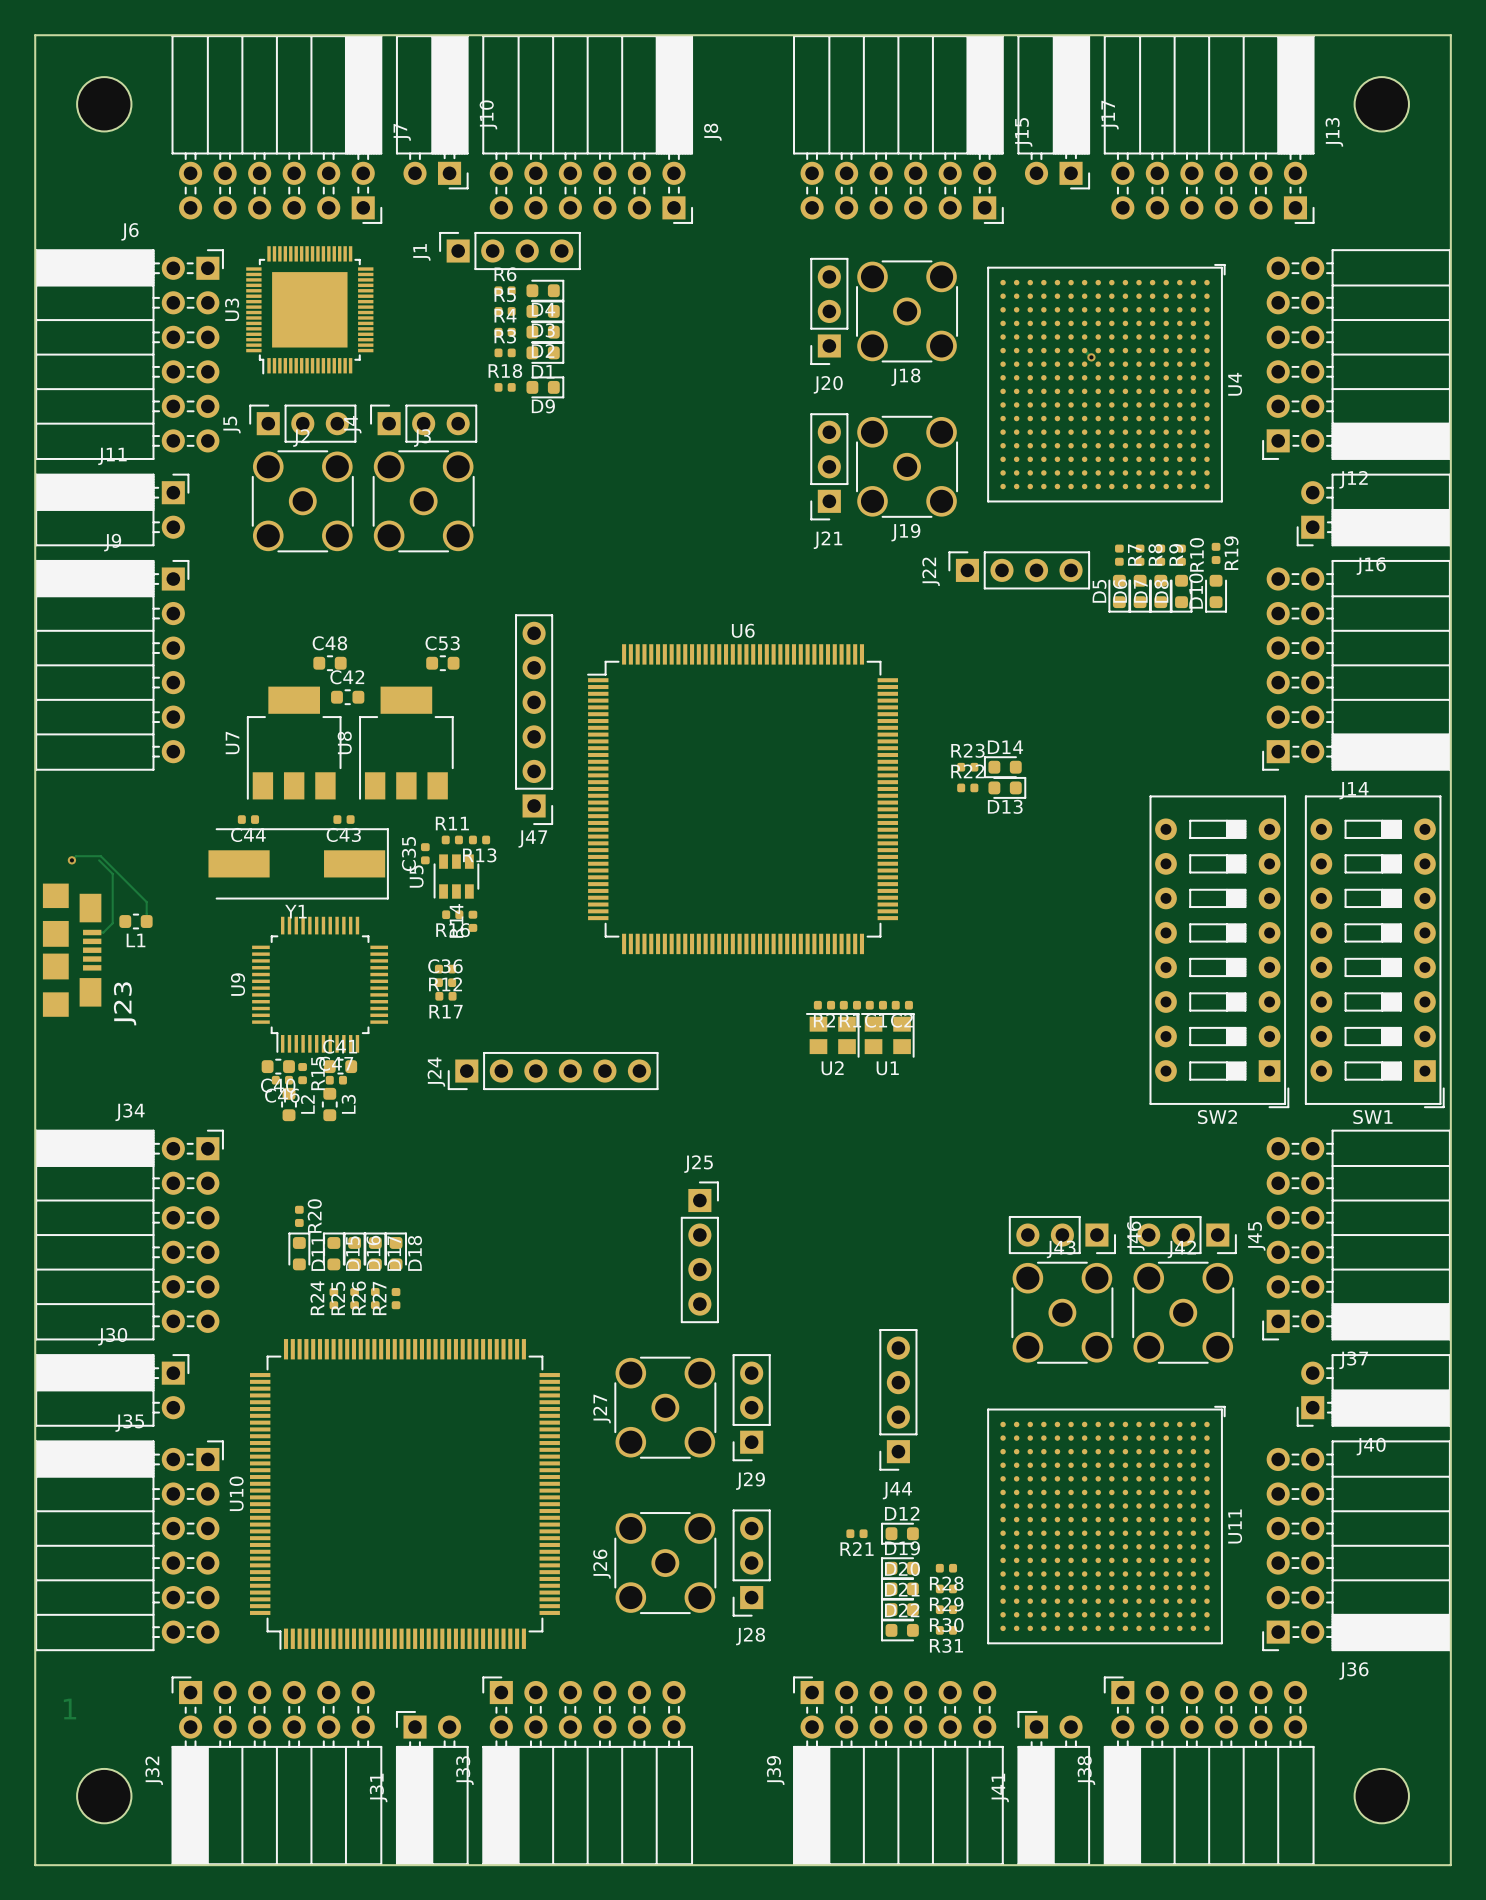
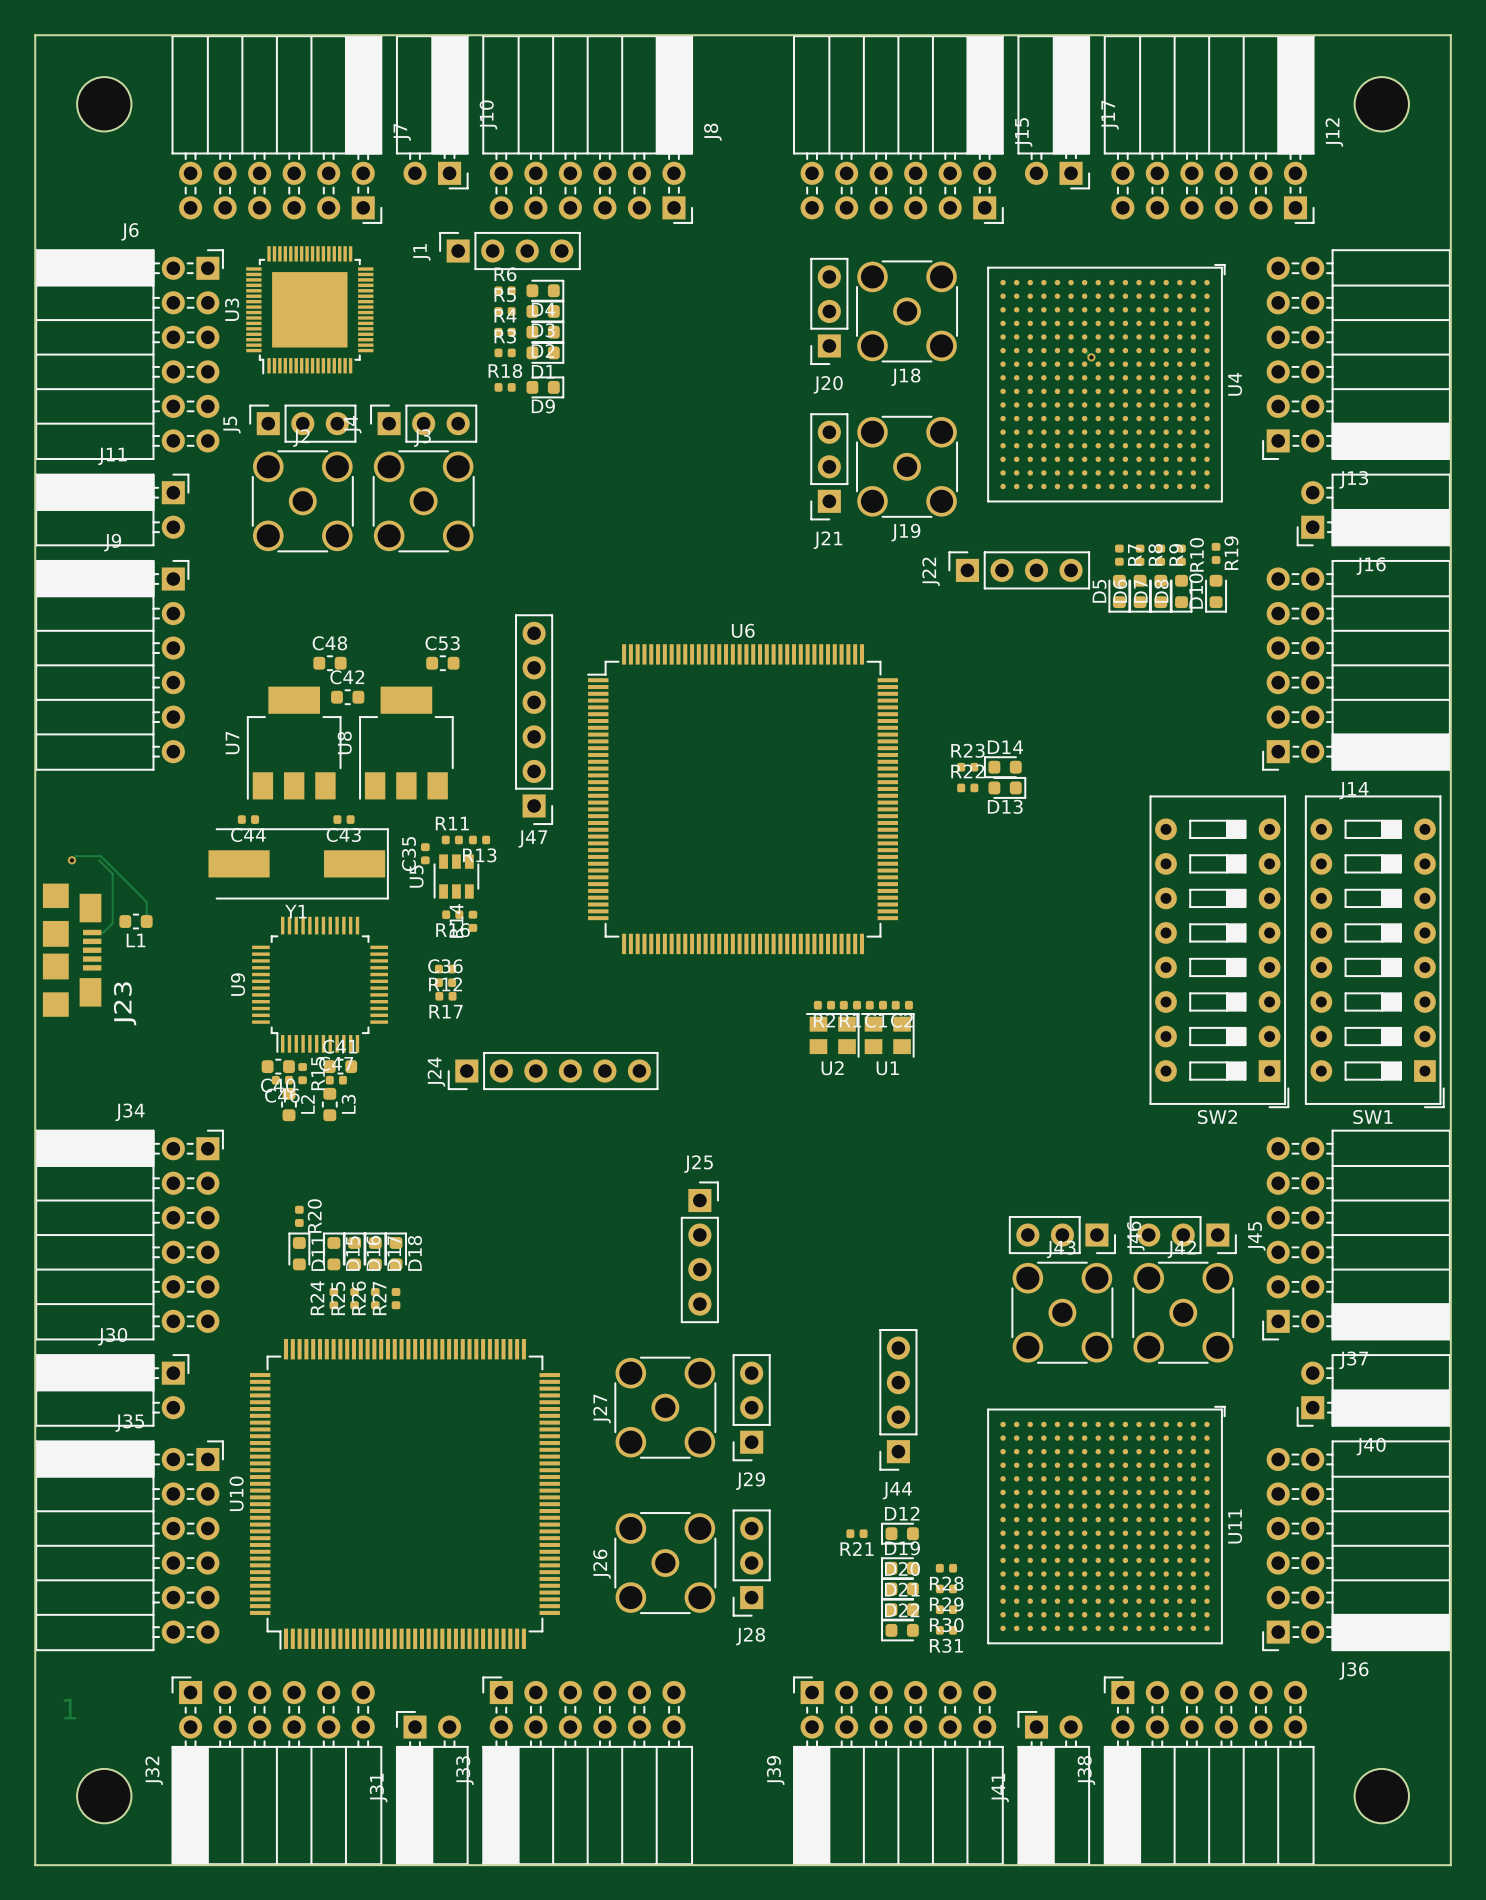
J13 name: J13 (1334, 132) -> J12 (1334, 132)
J12 name: J12 (1353, 479) -> J13 (1353, 479)

